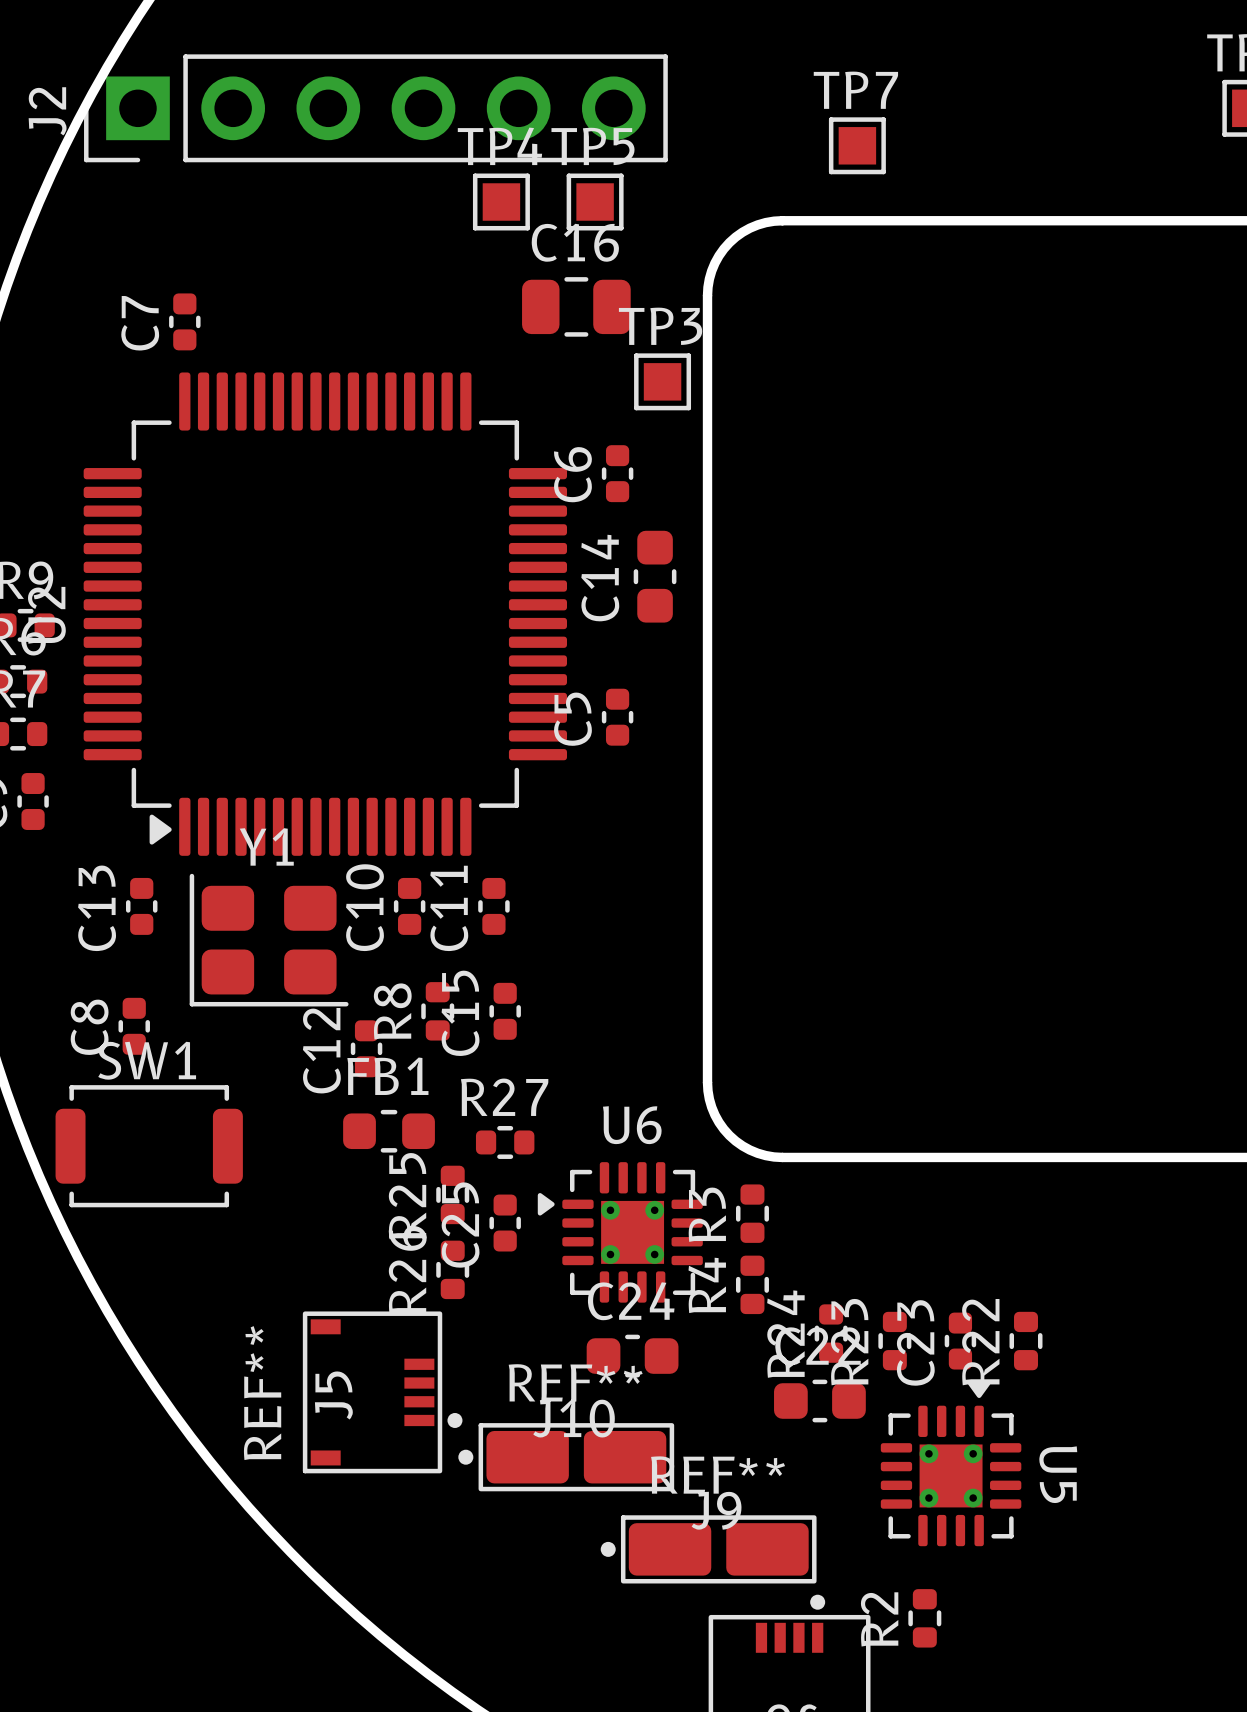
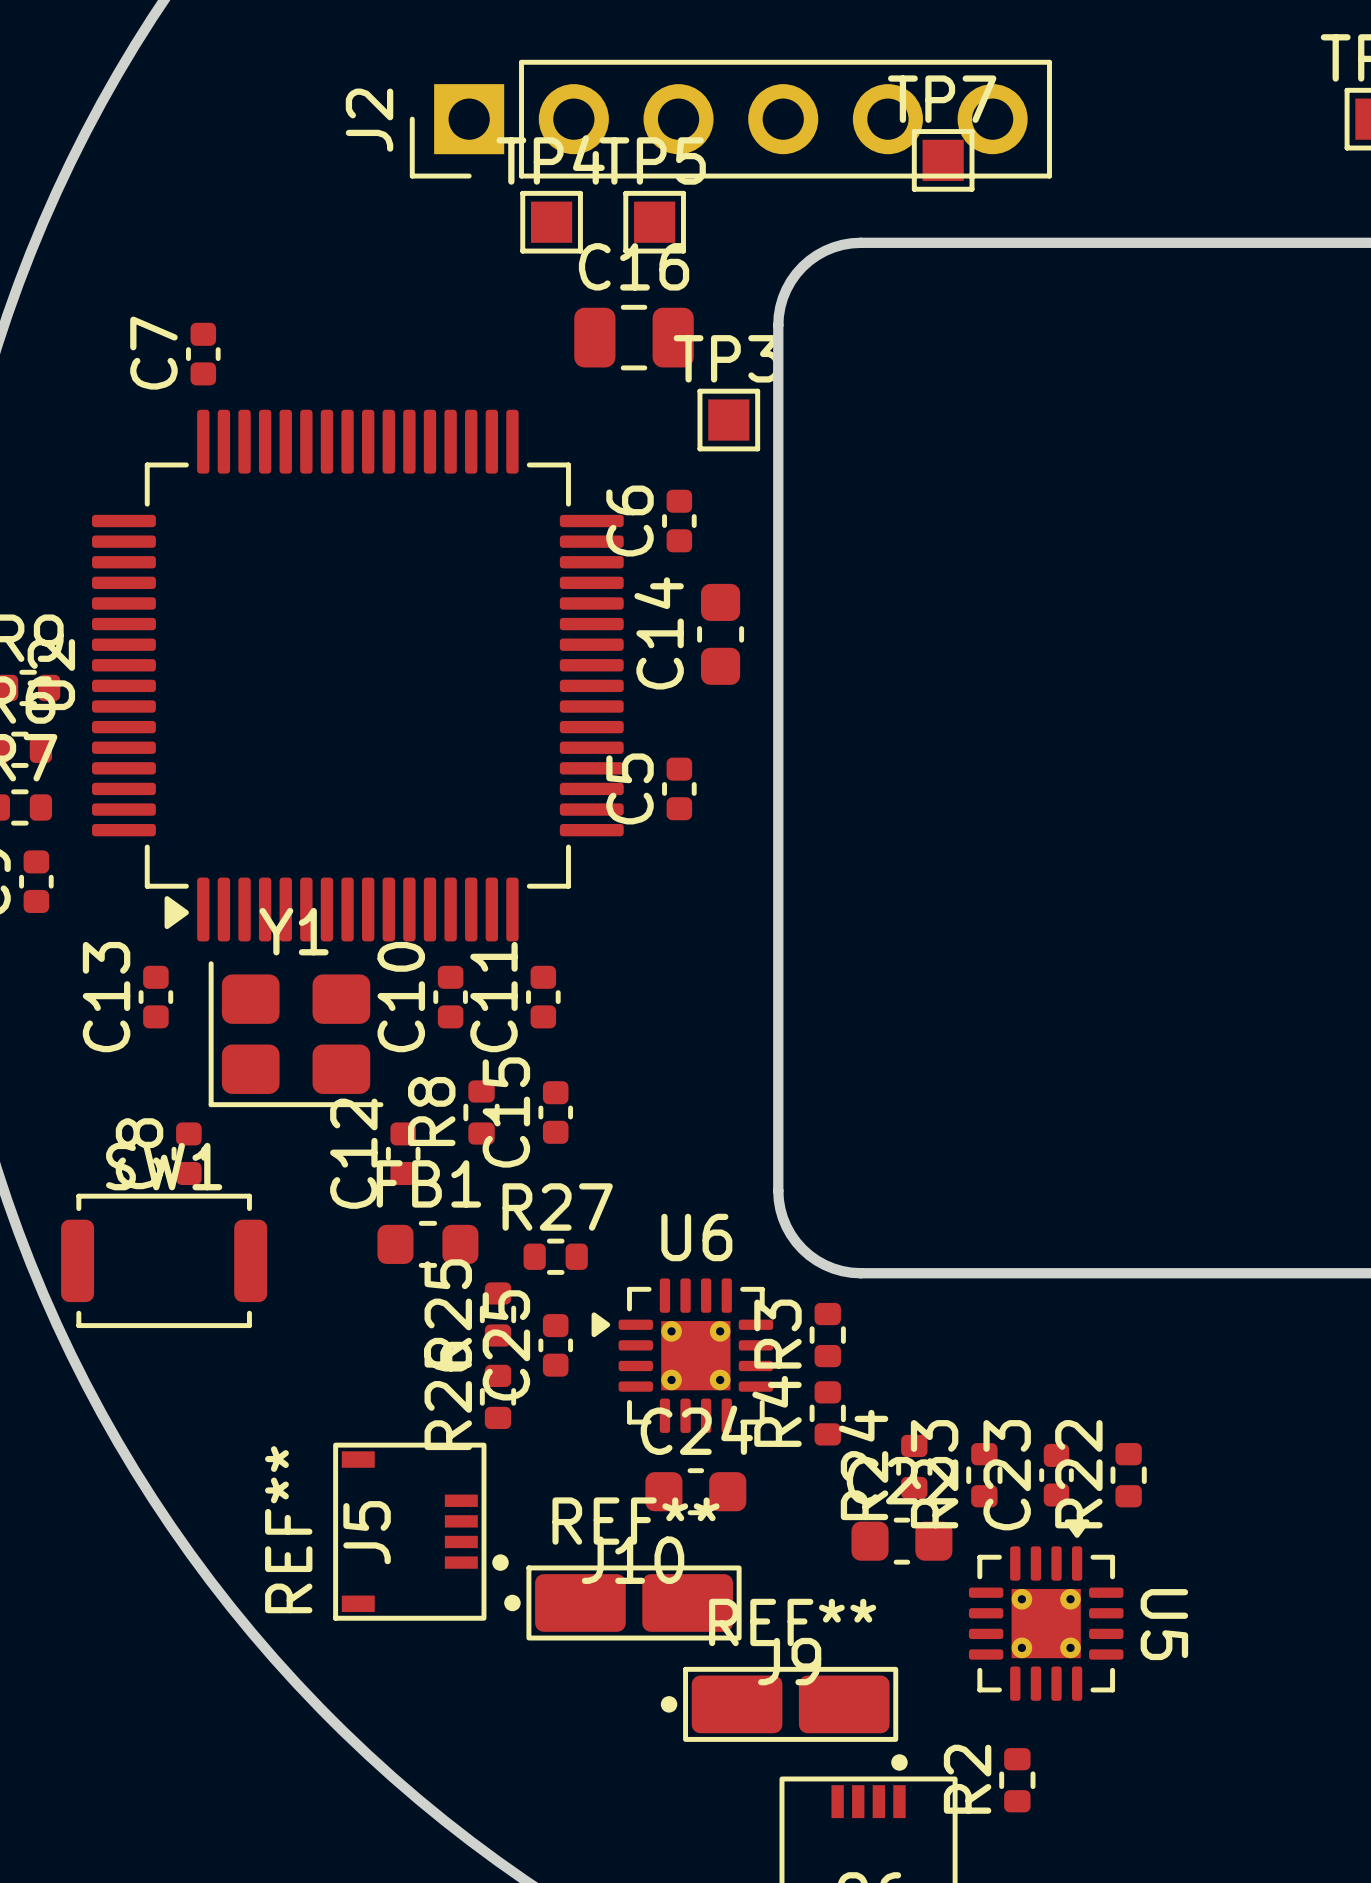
J2 position: (375, 108) -> (730, 119)
C8 position: (134, 1026) -> (188, 1153)

